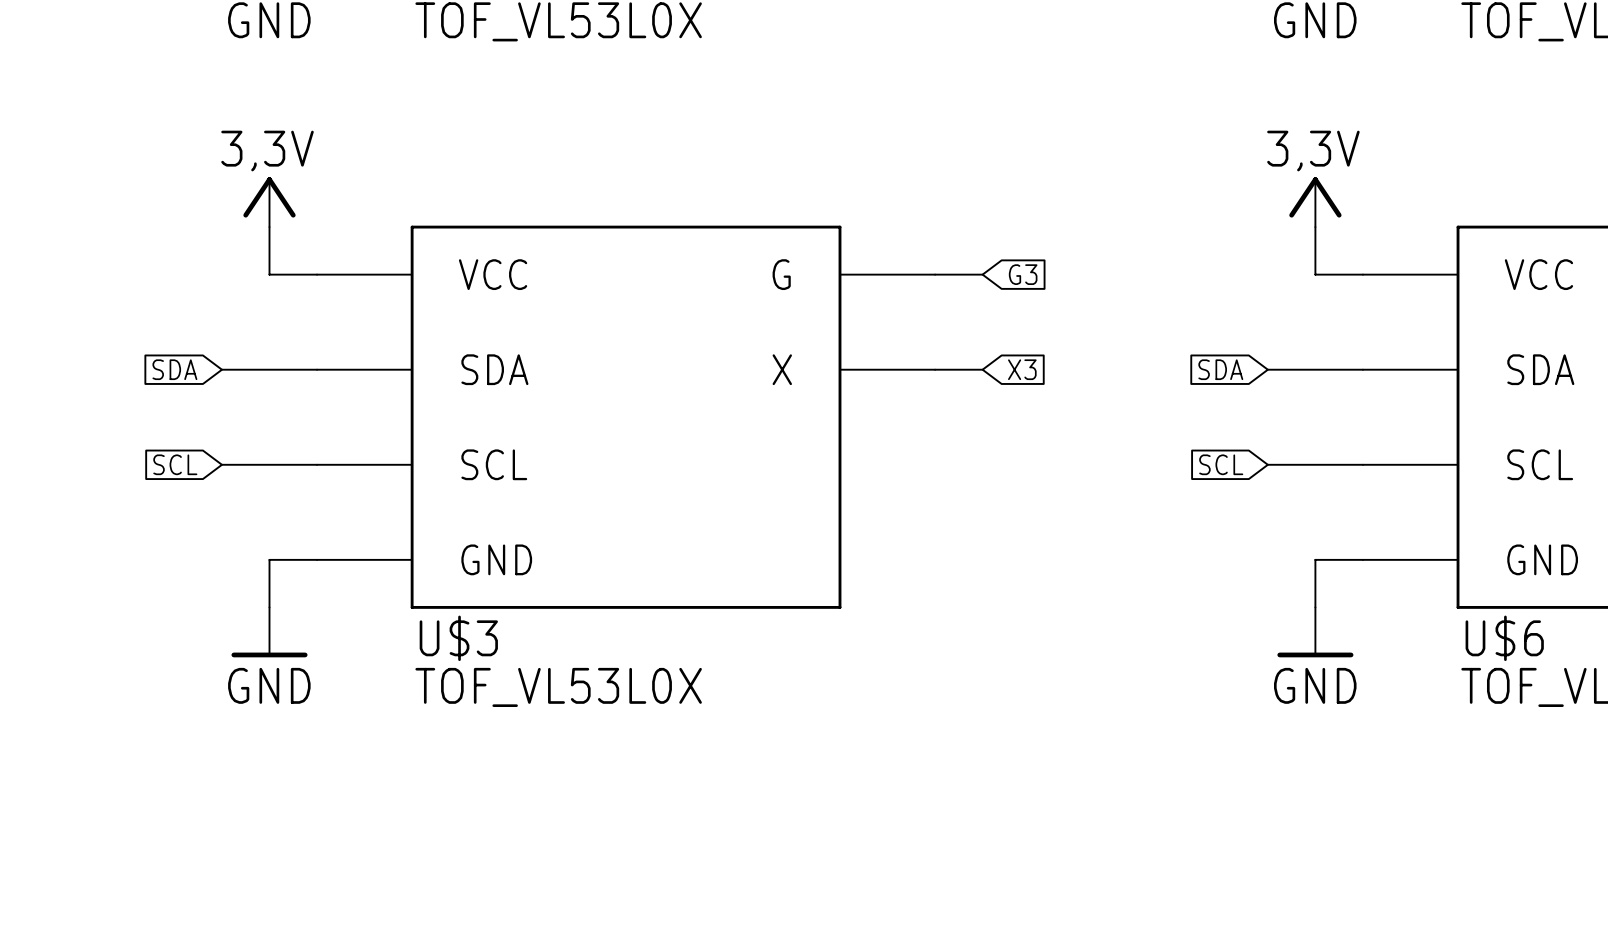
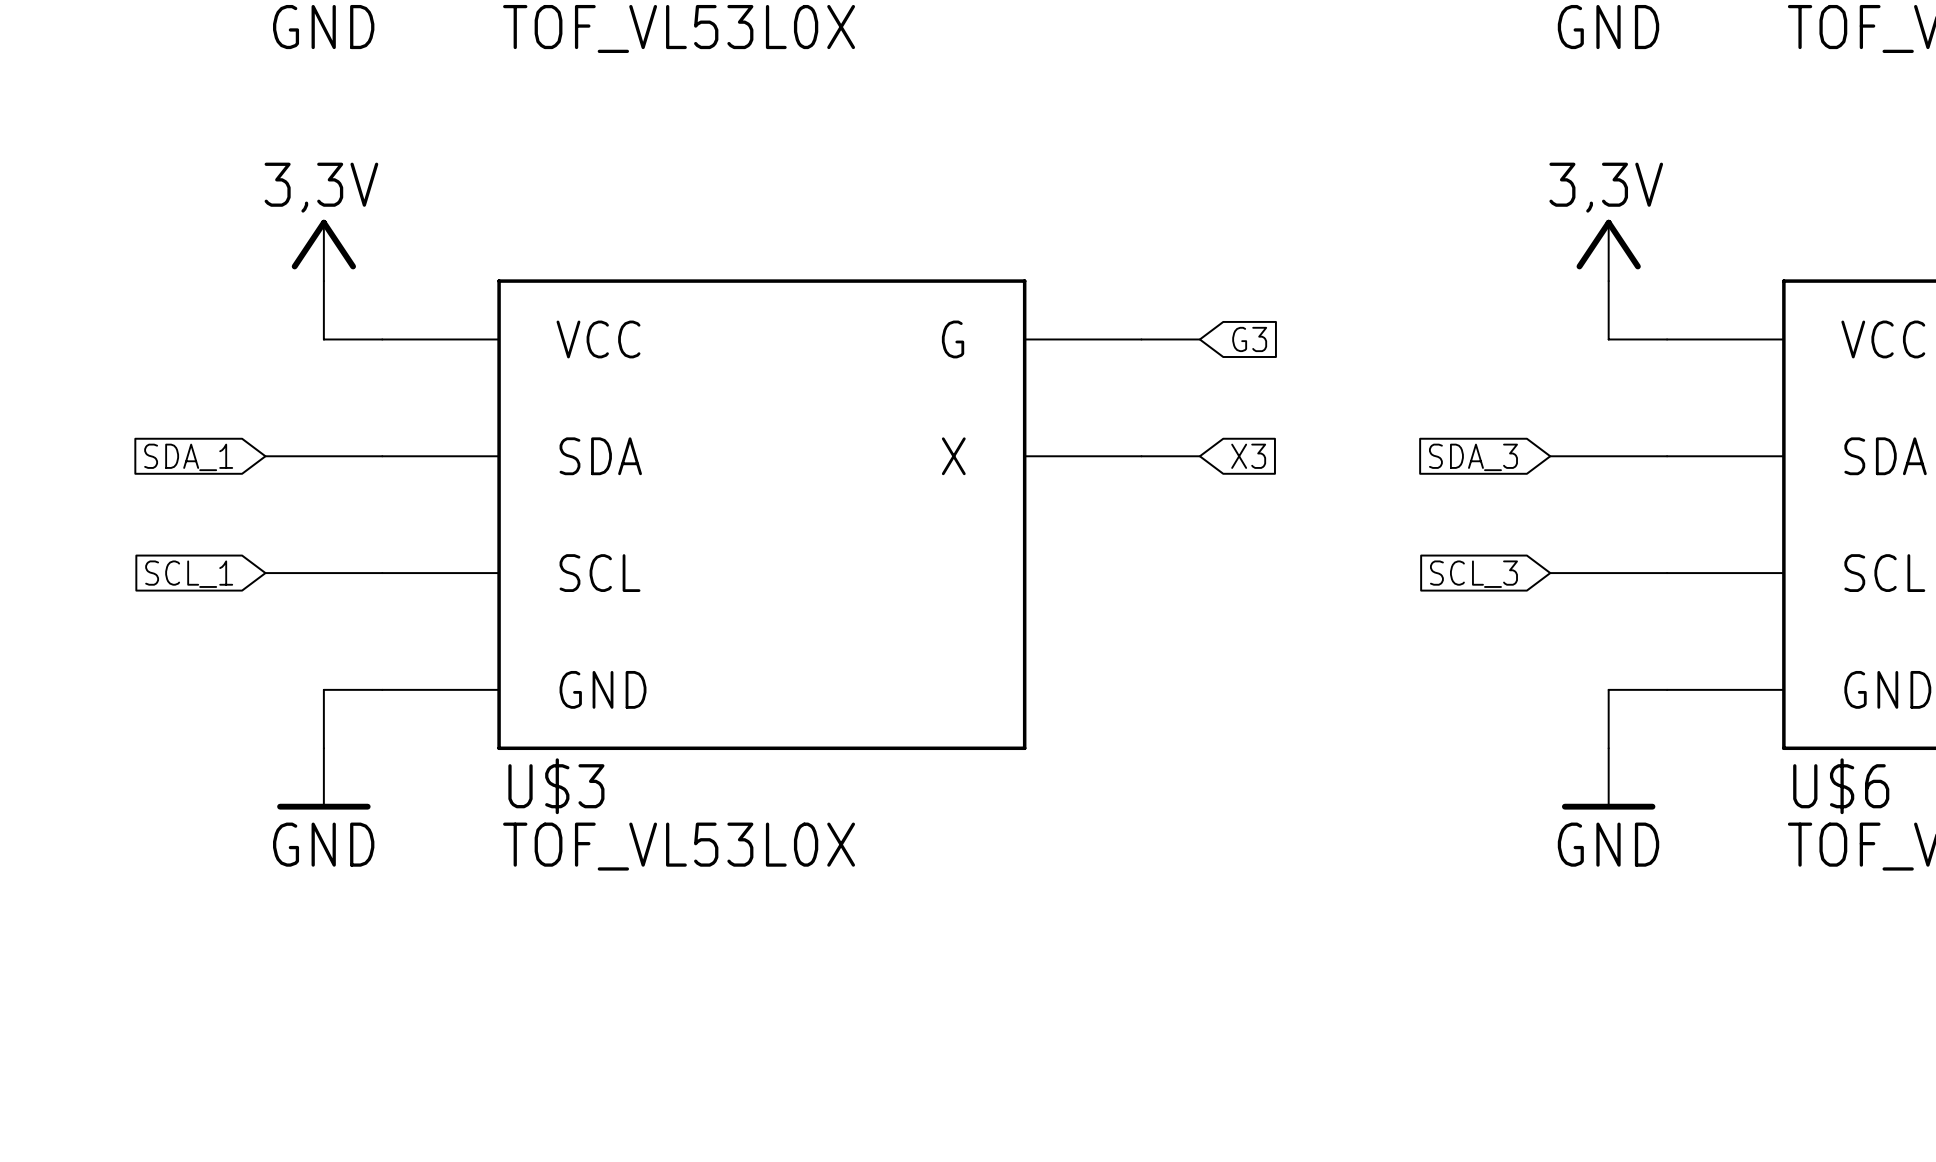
global label: SDA (174, 369) -> SDA_1 (188, 457)
global label: SDA (1220, 369) -> SDA_3 (1473, 457)
global label: SCL (175, 464) -> SCL_1 (189, 574)
global label: SCL (1221, 464) -> SCL_3 (1473, 574)

